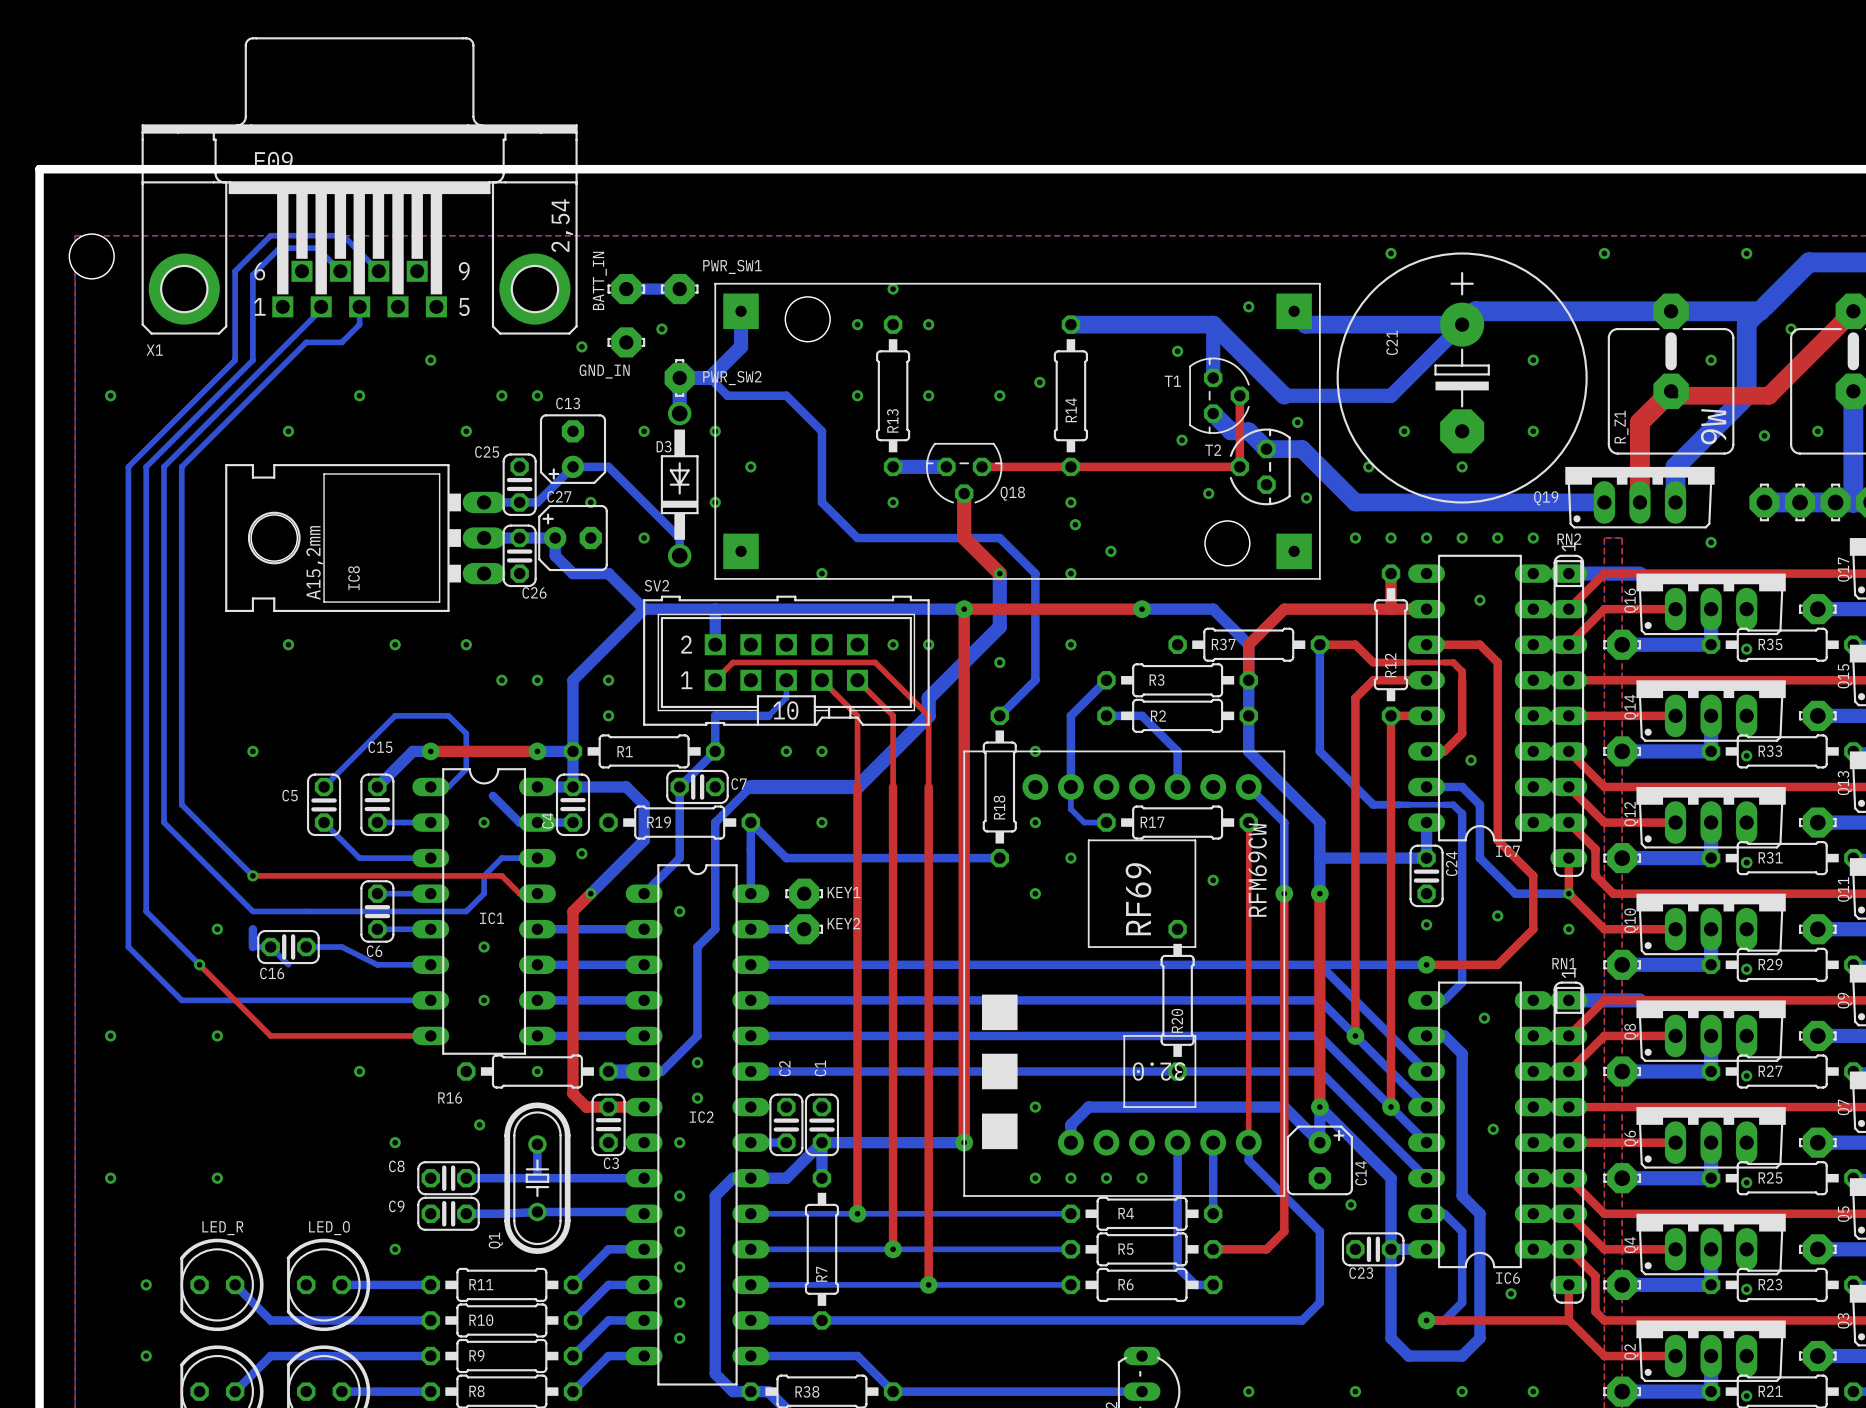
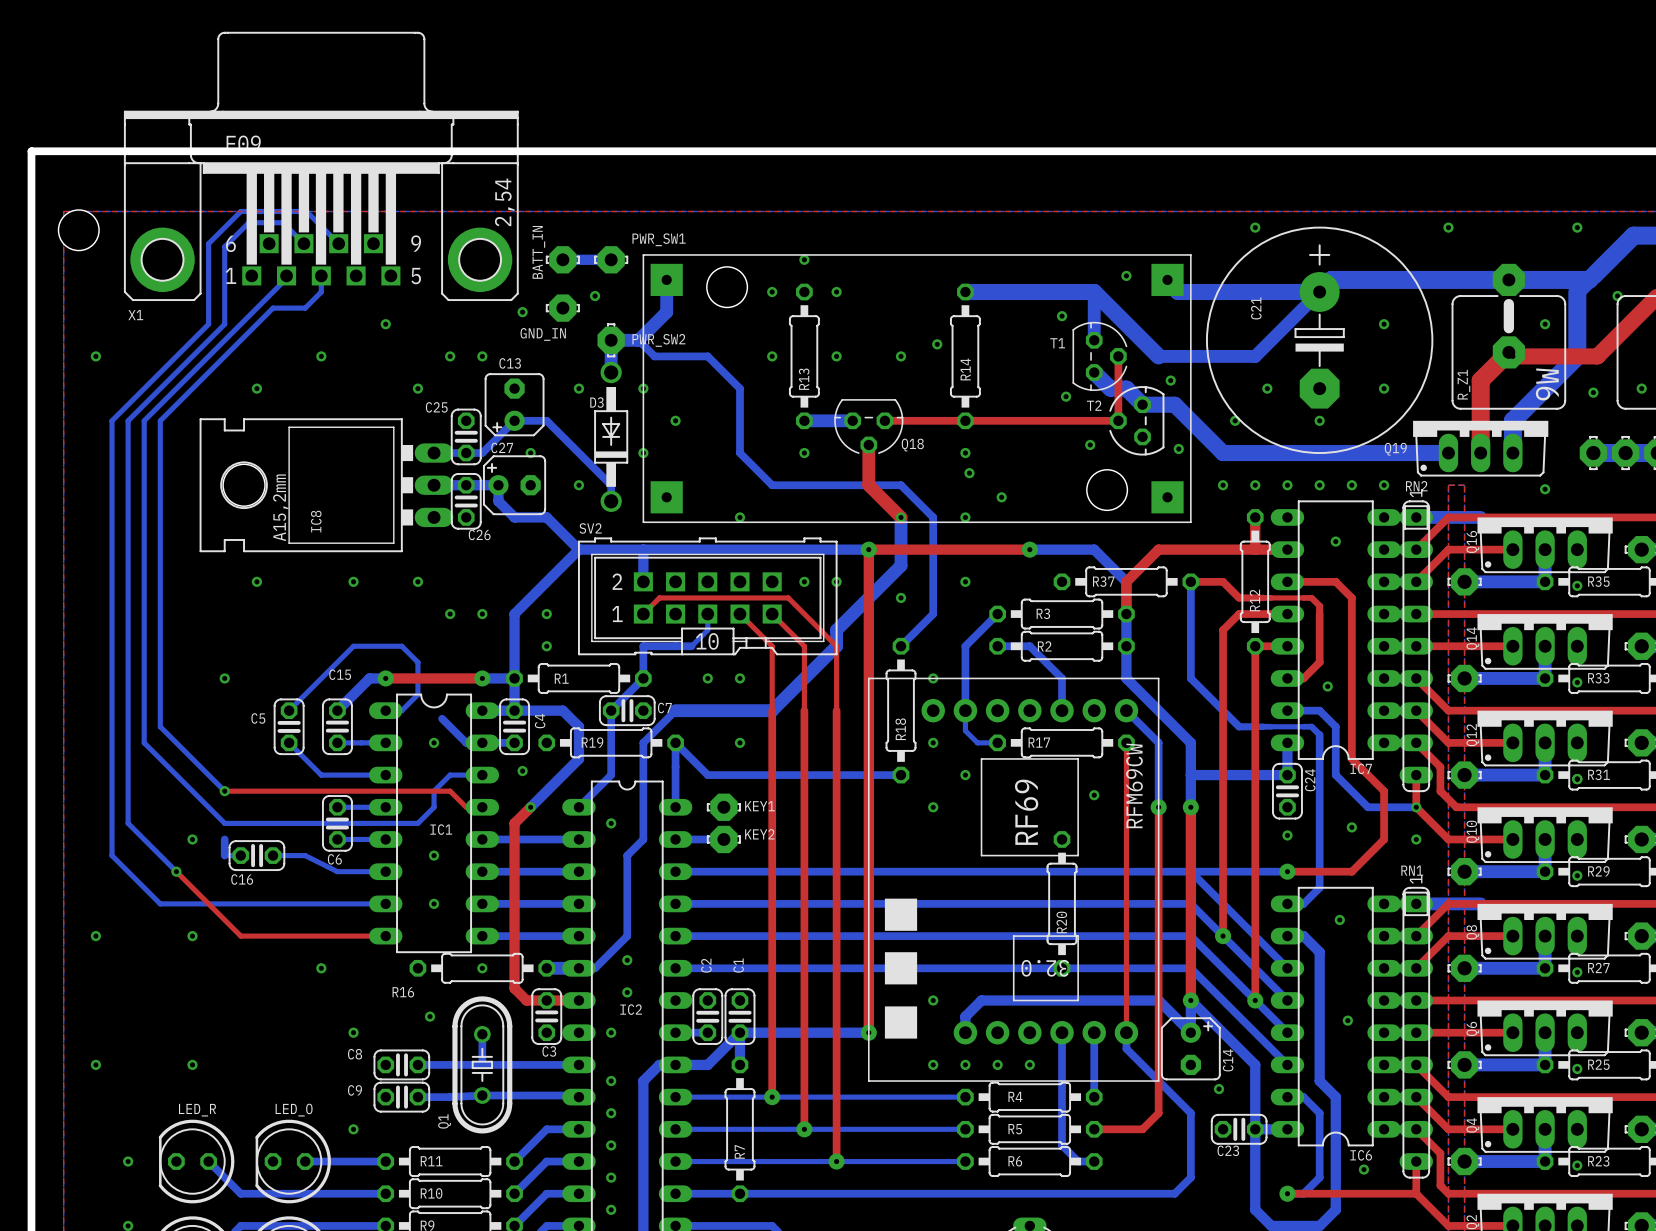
C4 name position: C4 (547, 820) -> C4 (540, 721)
bottom track: (270, 947) (288, 964) -> none

